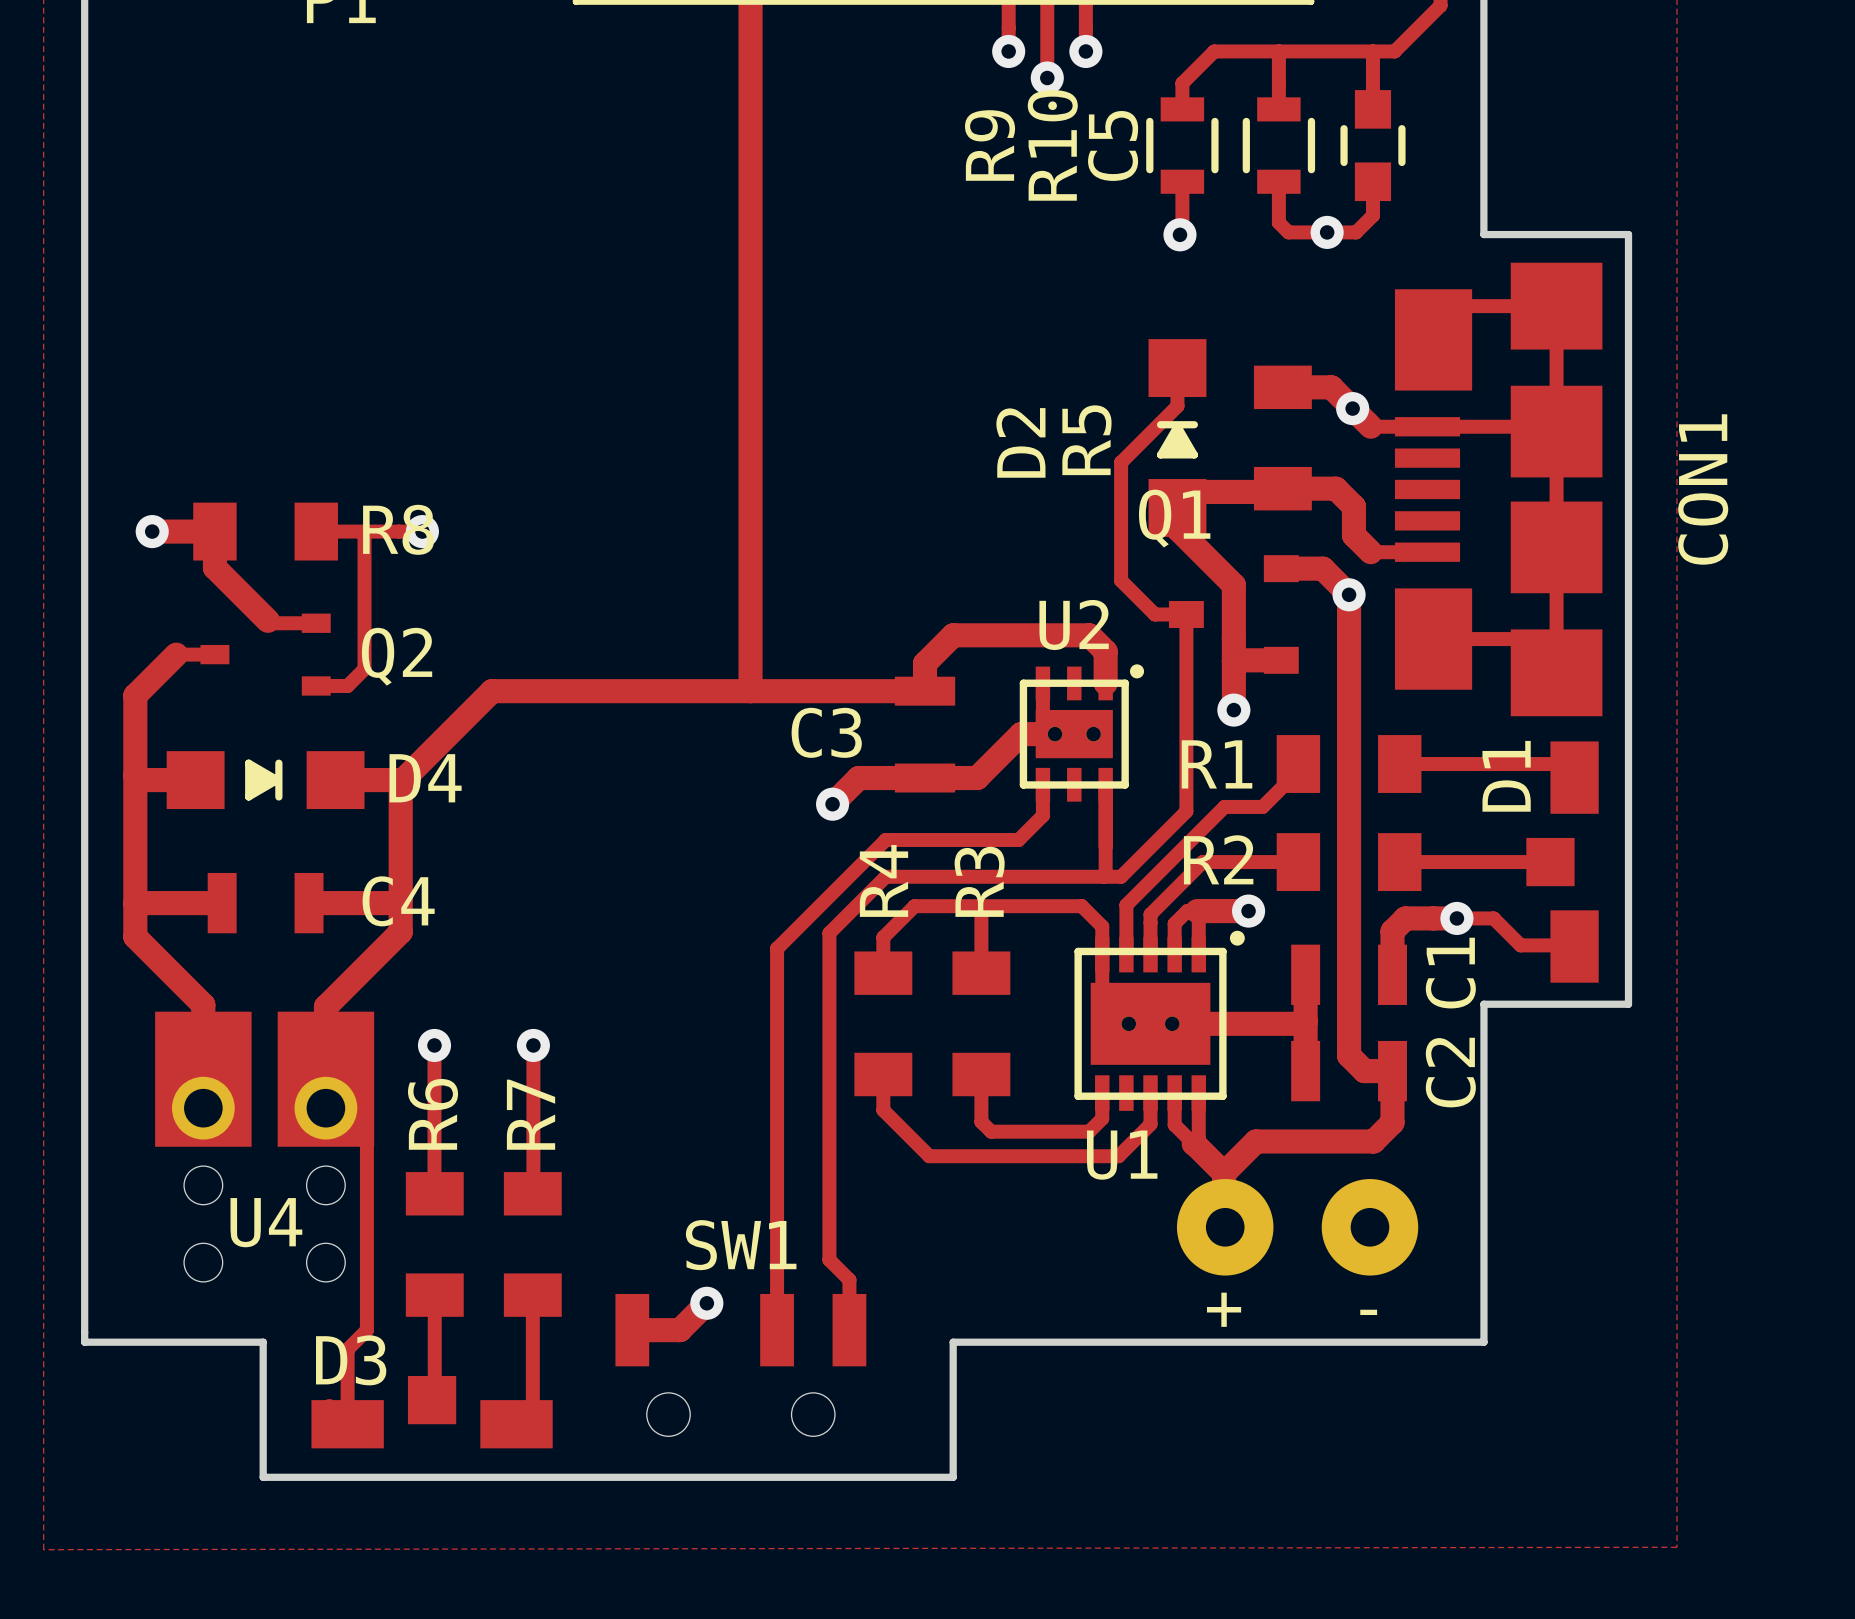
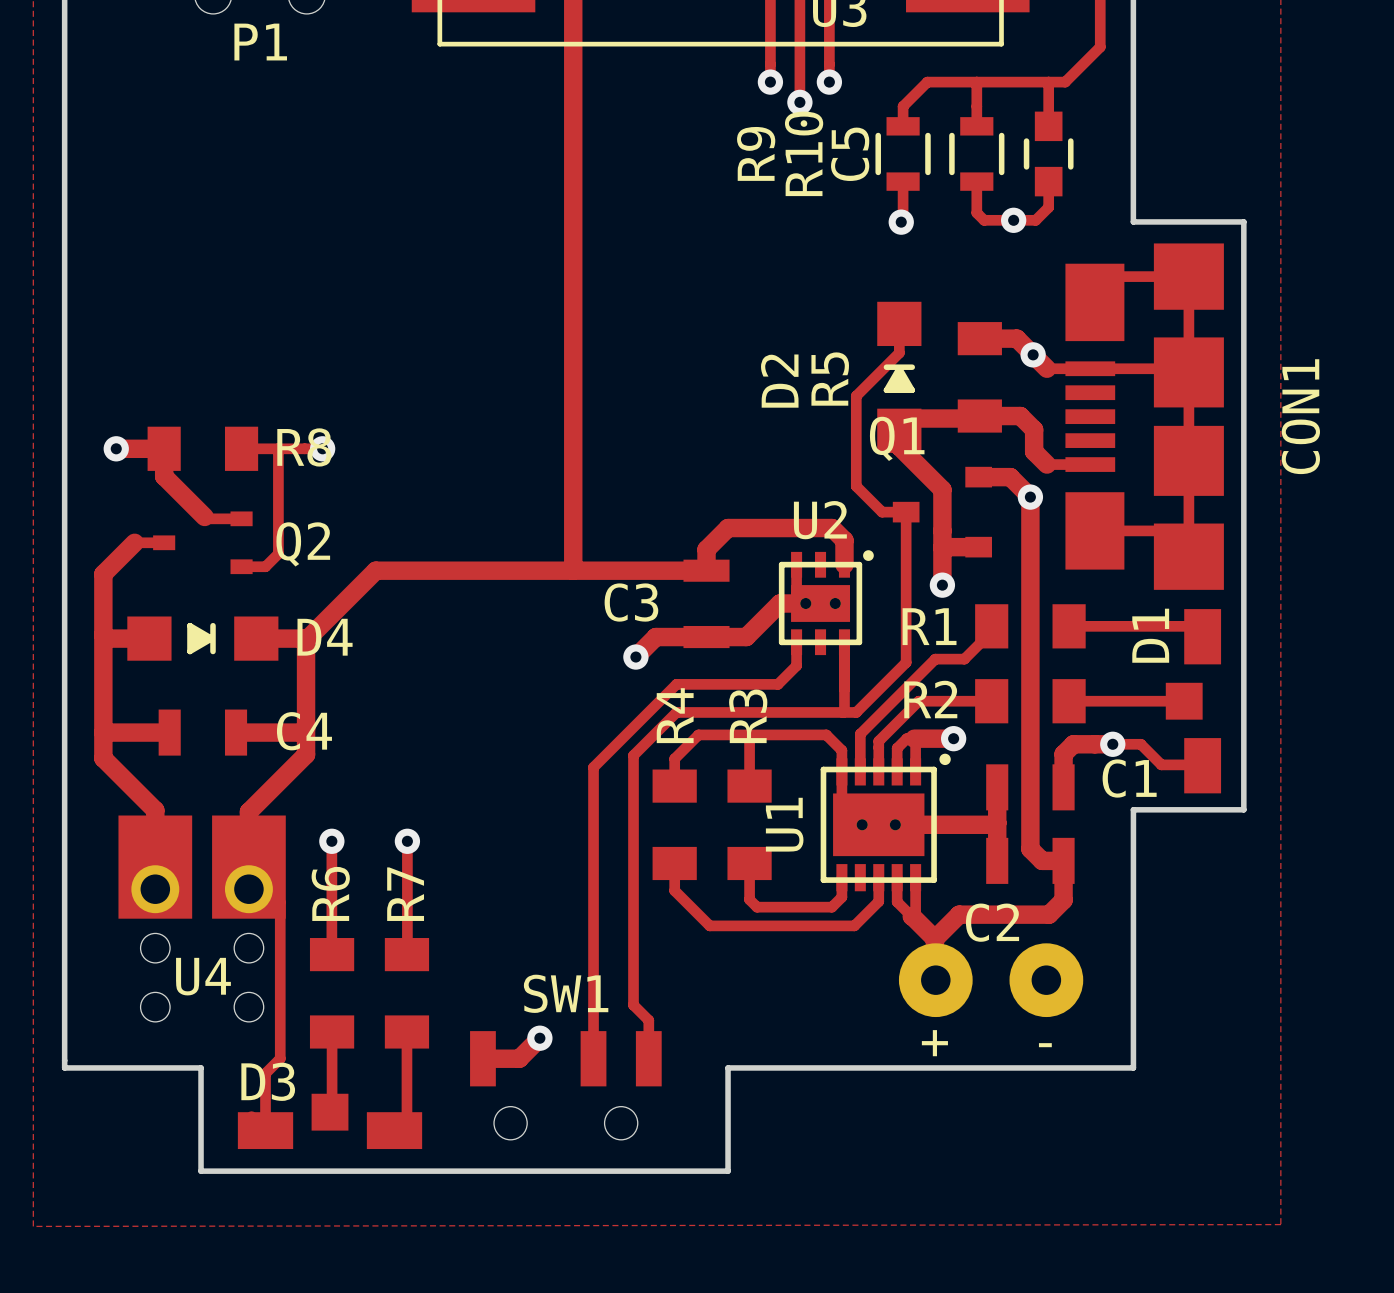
C1 name rotation: 0° (1450, 973) -> 90° clockwise (1129, 778)
C2 name rotation: 0° (1450, 1072) -> 90° clockwise (992, 922)
C2 name position: C2 (1450, 1072) -> C2 (992, 922)
U1 name rotation: 0° (1122, 1155) -> 90° counterclockwise (784, 824)
U1 name position: U1 (1122, 1155) -> U1 (784, 824)

